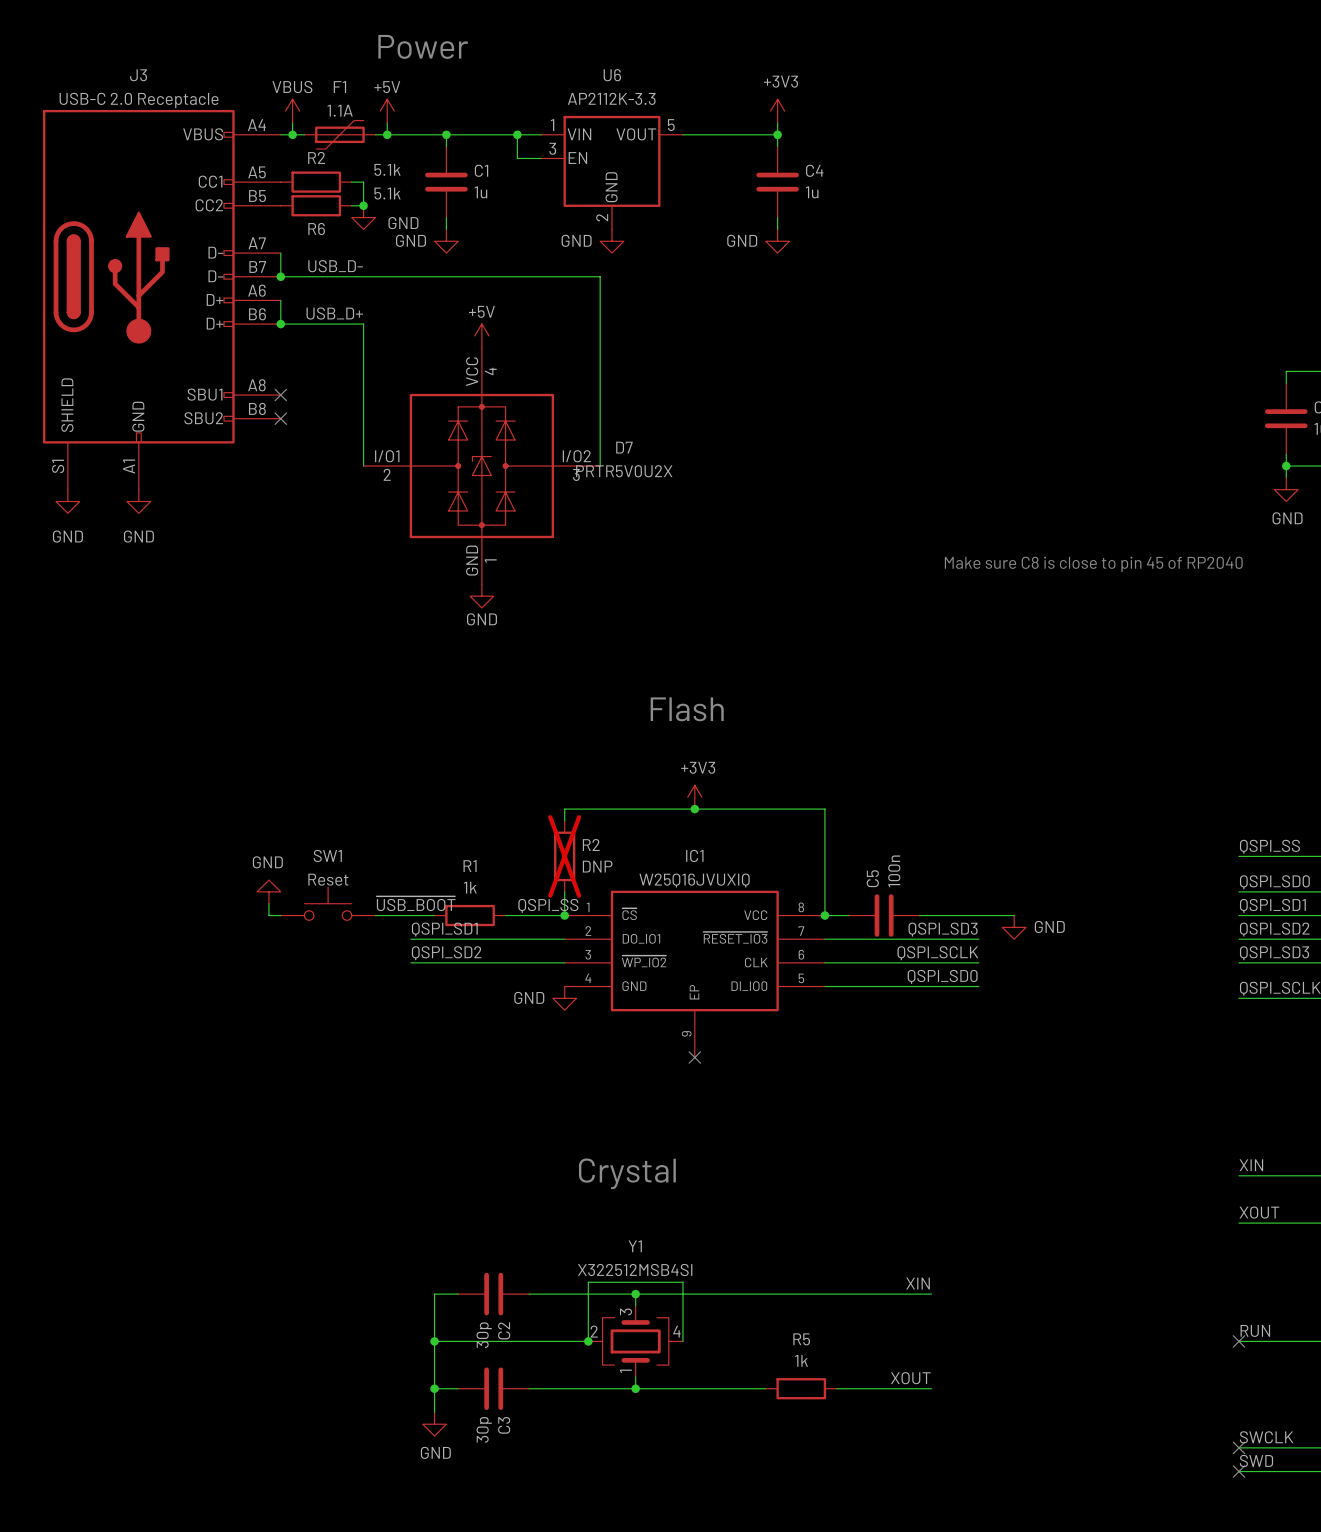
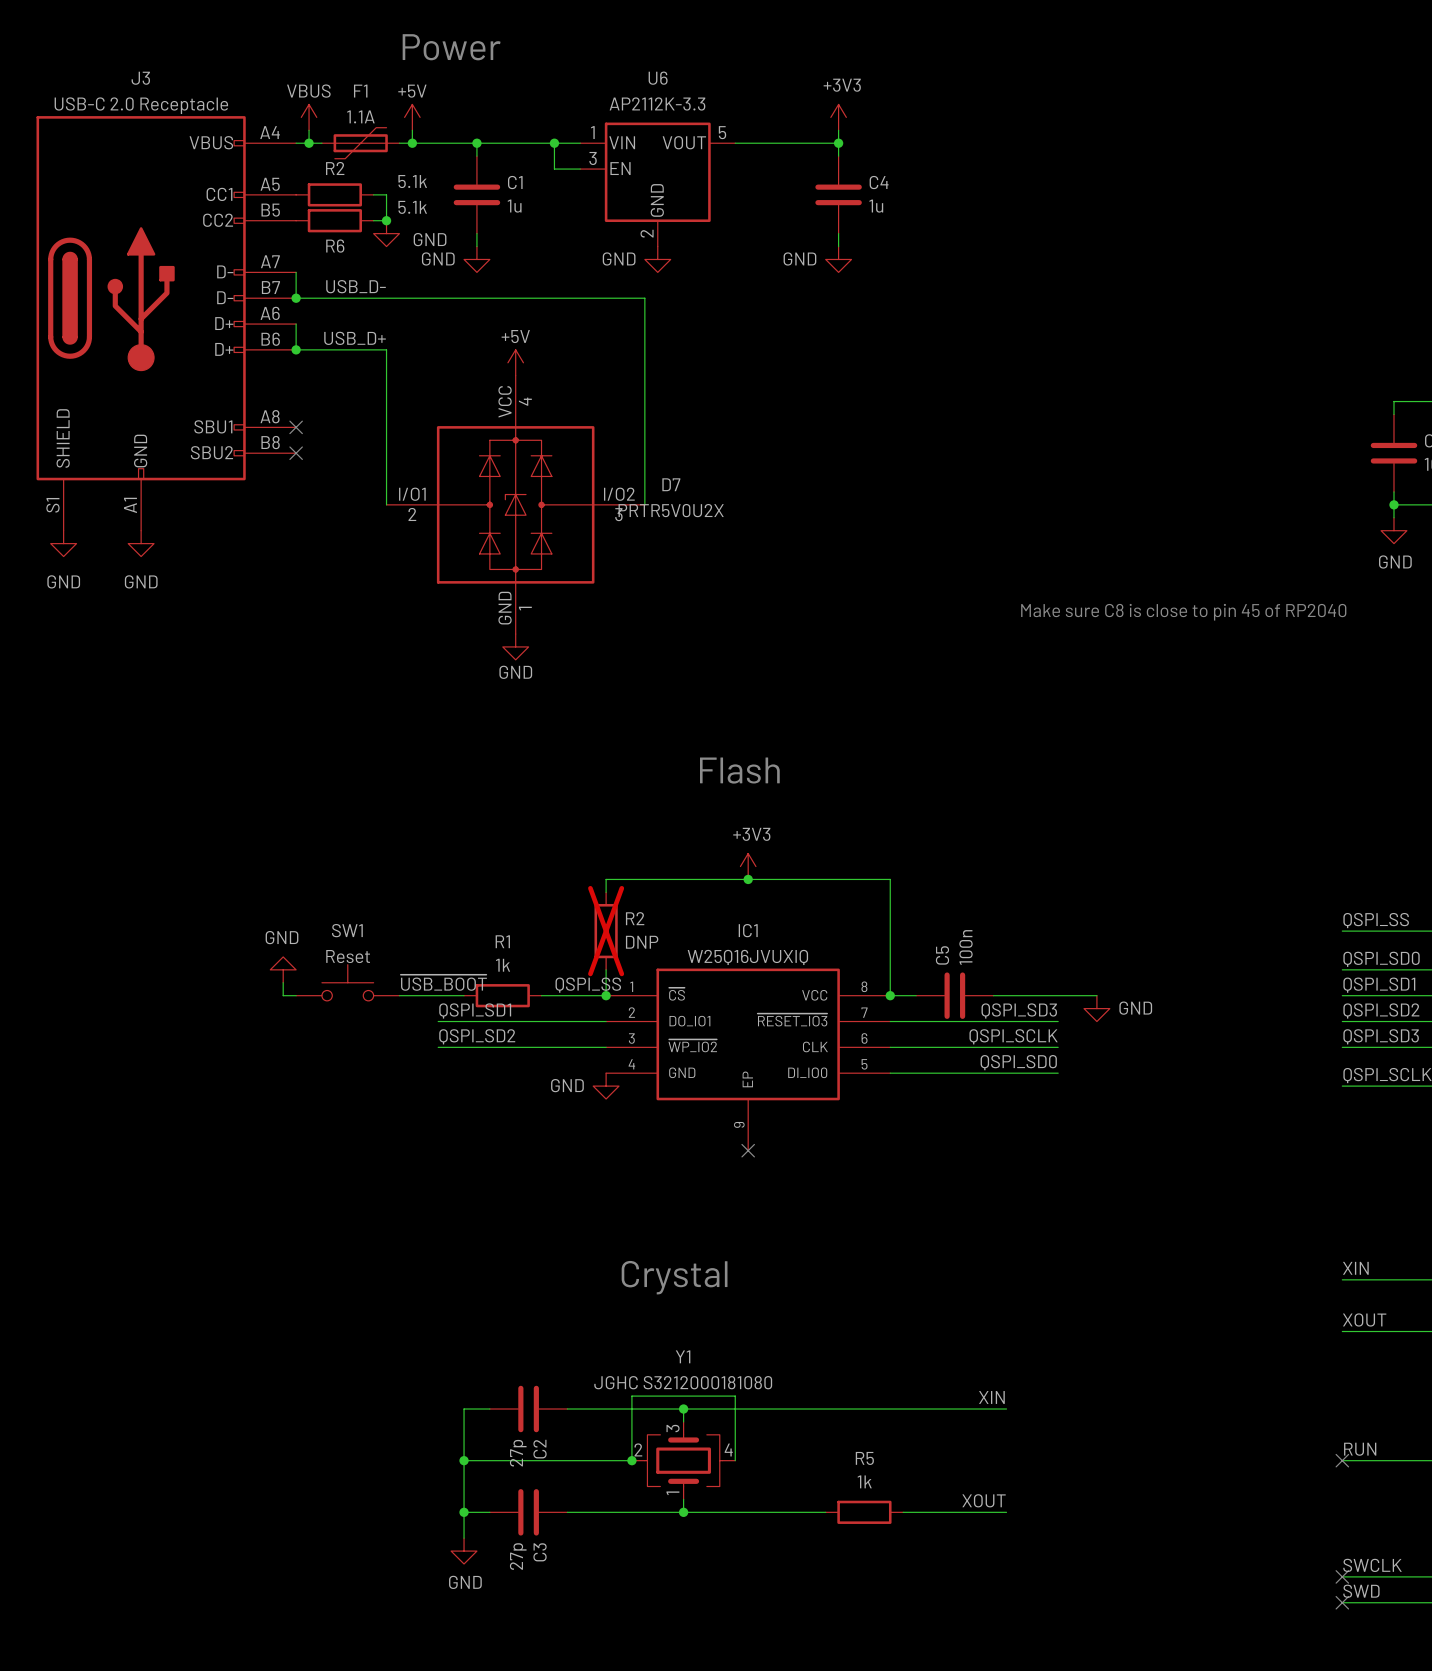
Y1 value: X322512MSB4SI (635, 1269) -> JGHC S3212000181080 (683, 1382)
C2 value: 30p (484, 1335) -> 27p (518, 1453)
C3 value: 30p (484, 1429) -> 27p (518, 1556)

